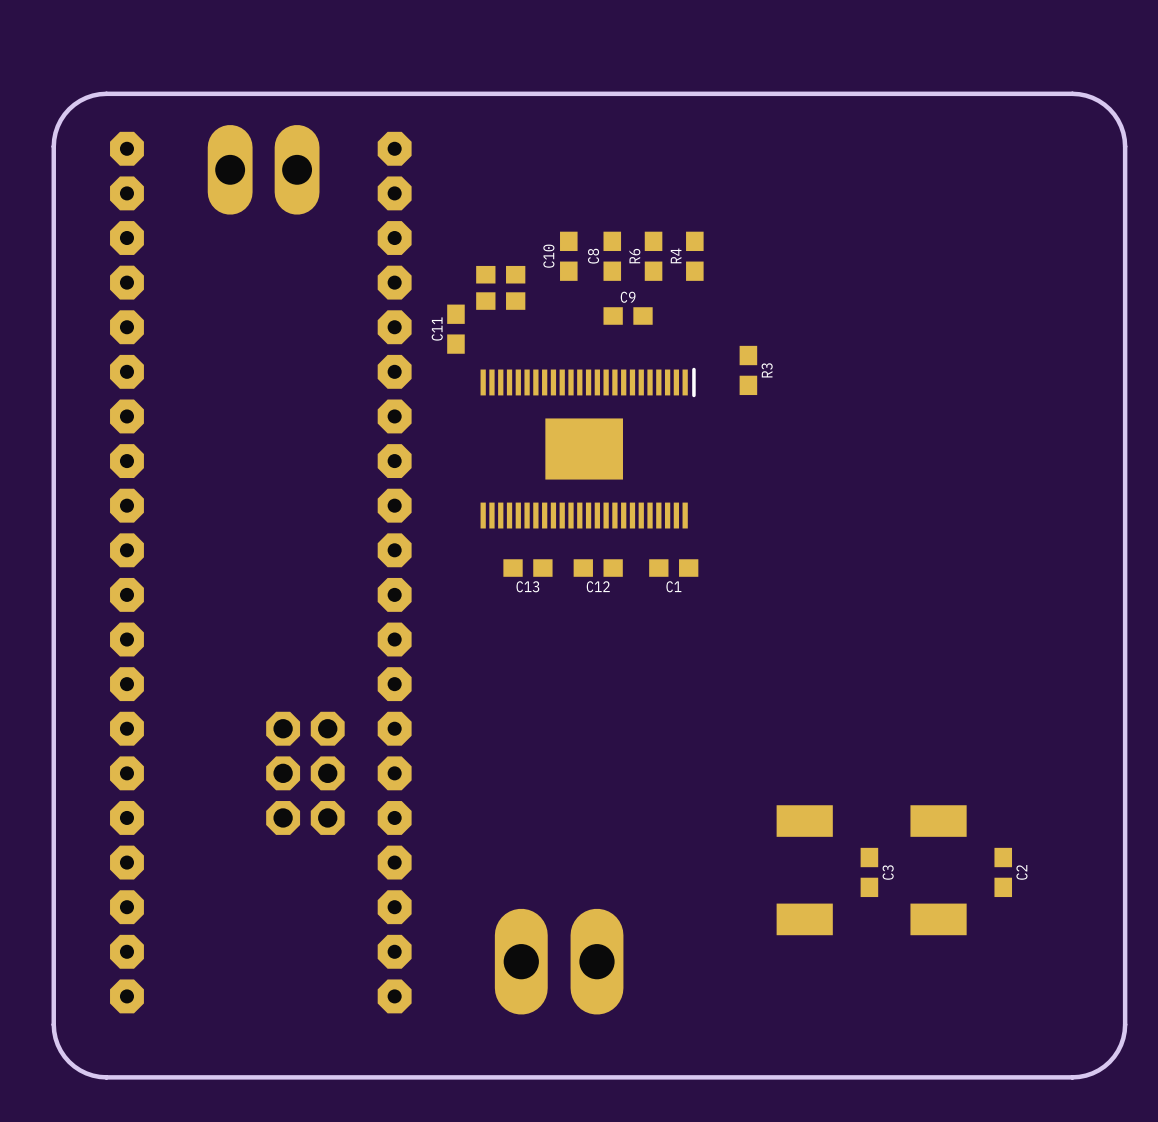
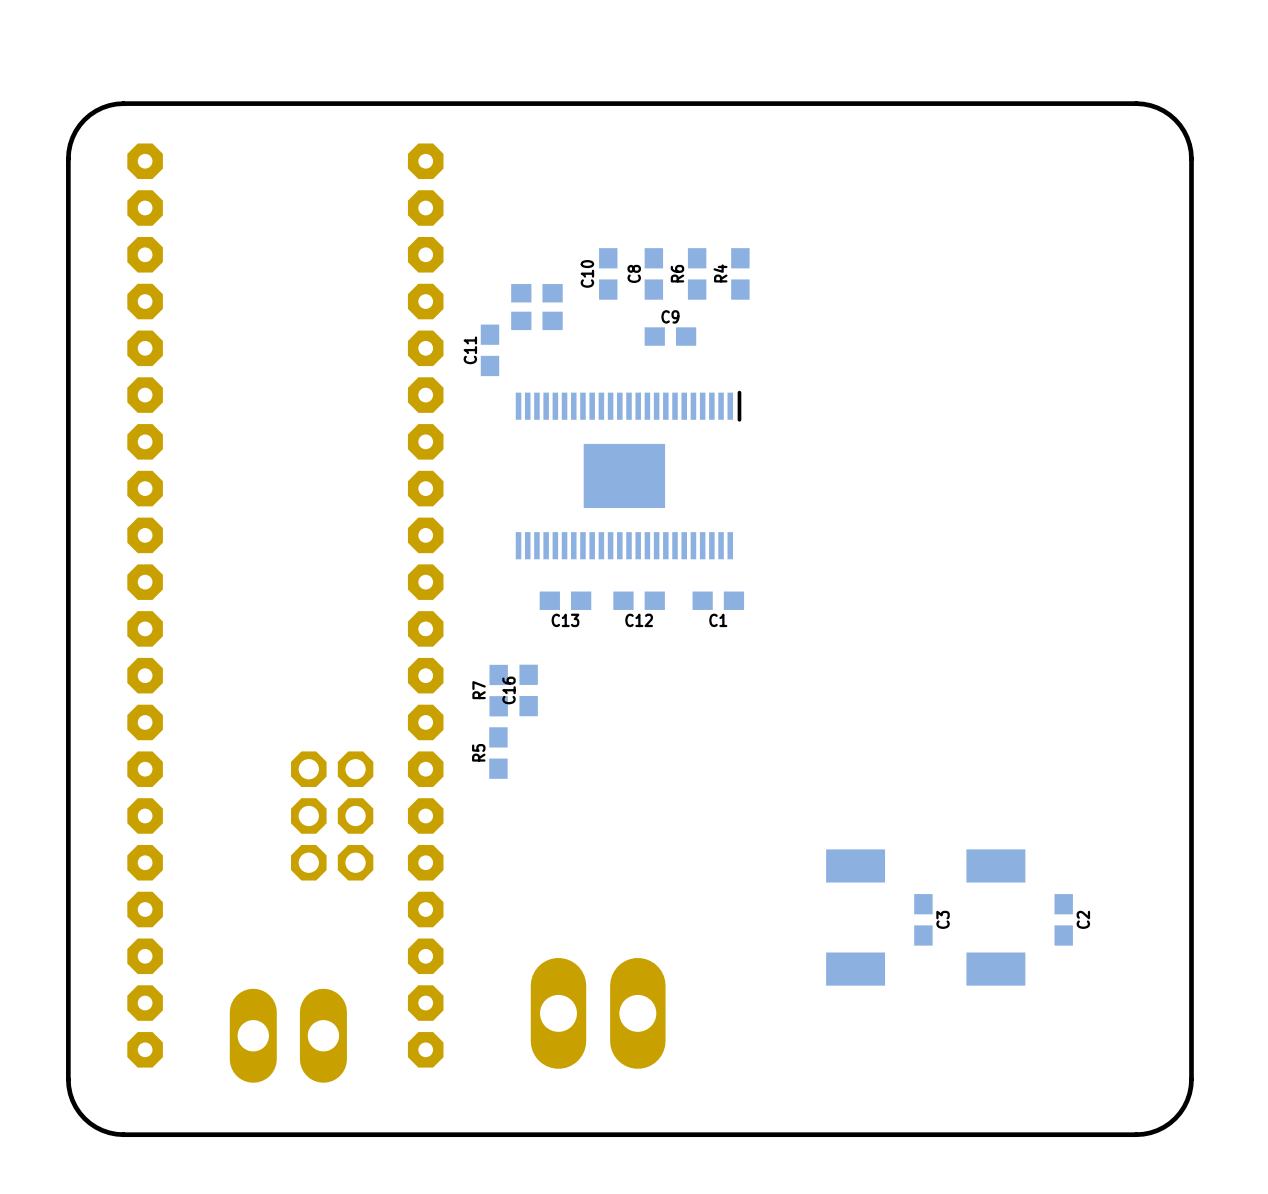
part: (263, 169) -> none
R3: (748, 370) -> none
R7: none -> (498, 690)
C16: none -> (528, 690)
R5: none -> (498, 753)
part: none -> (288, 1035)

